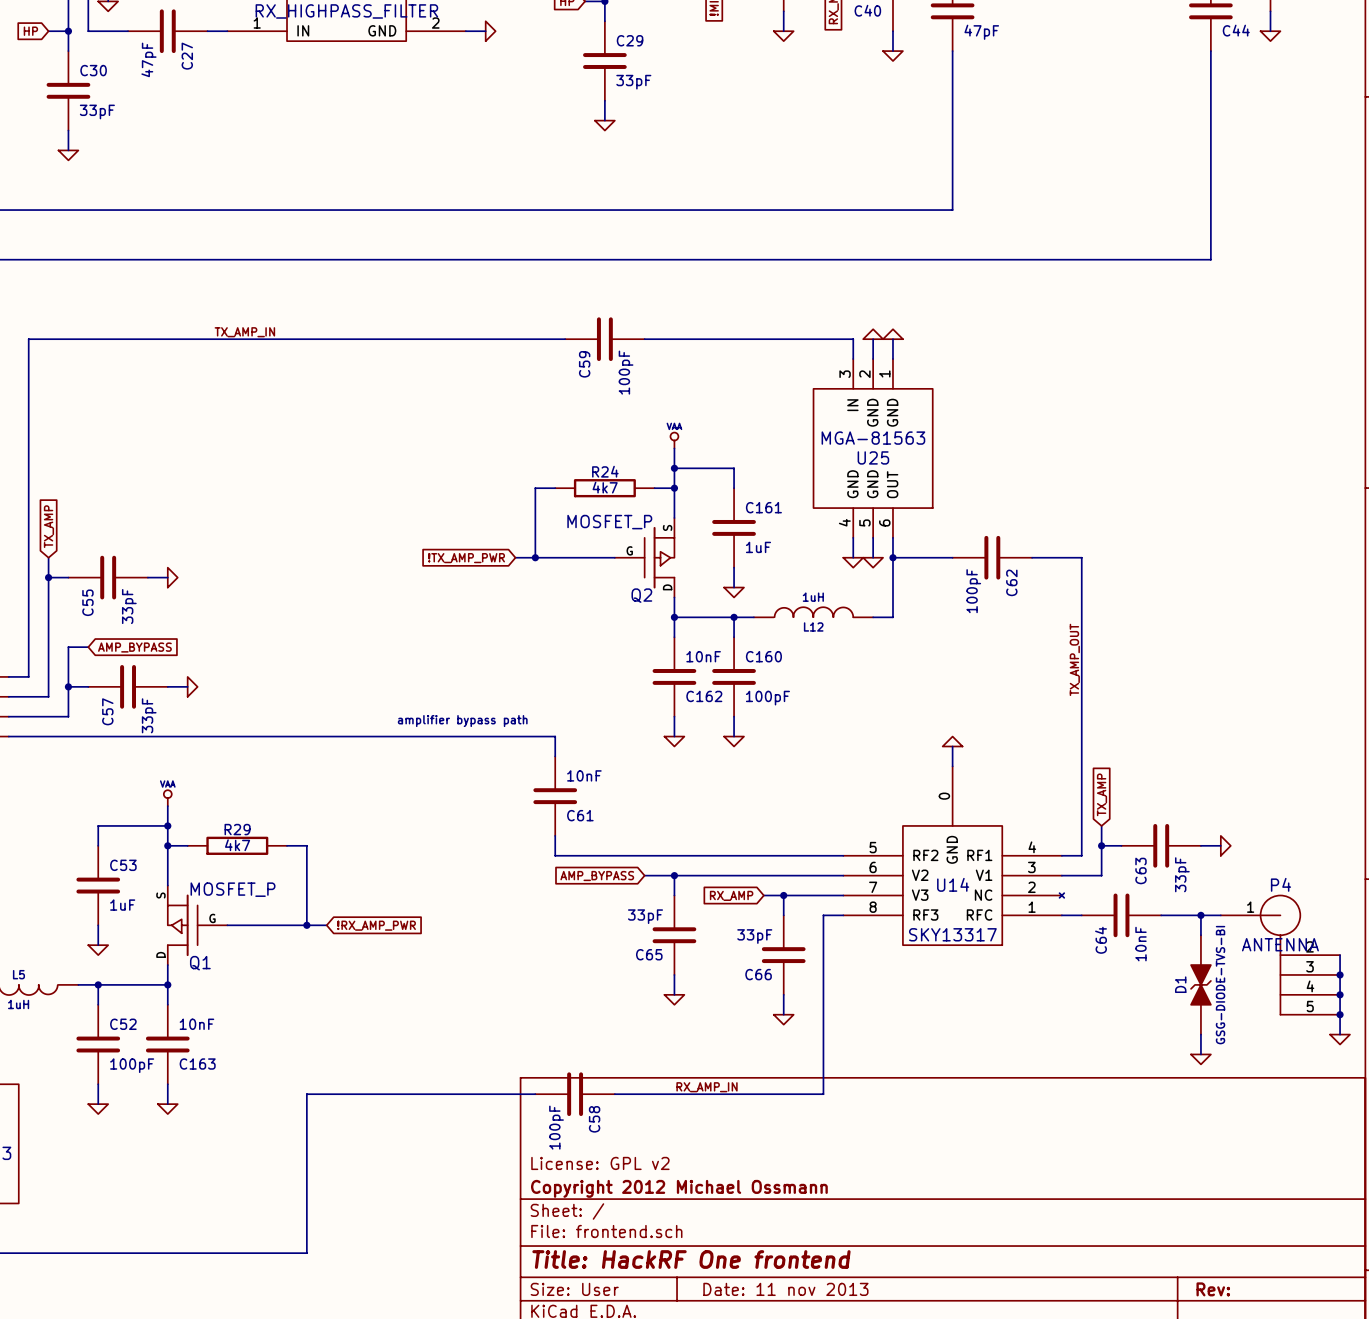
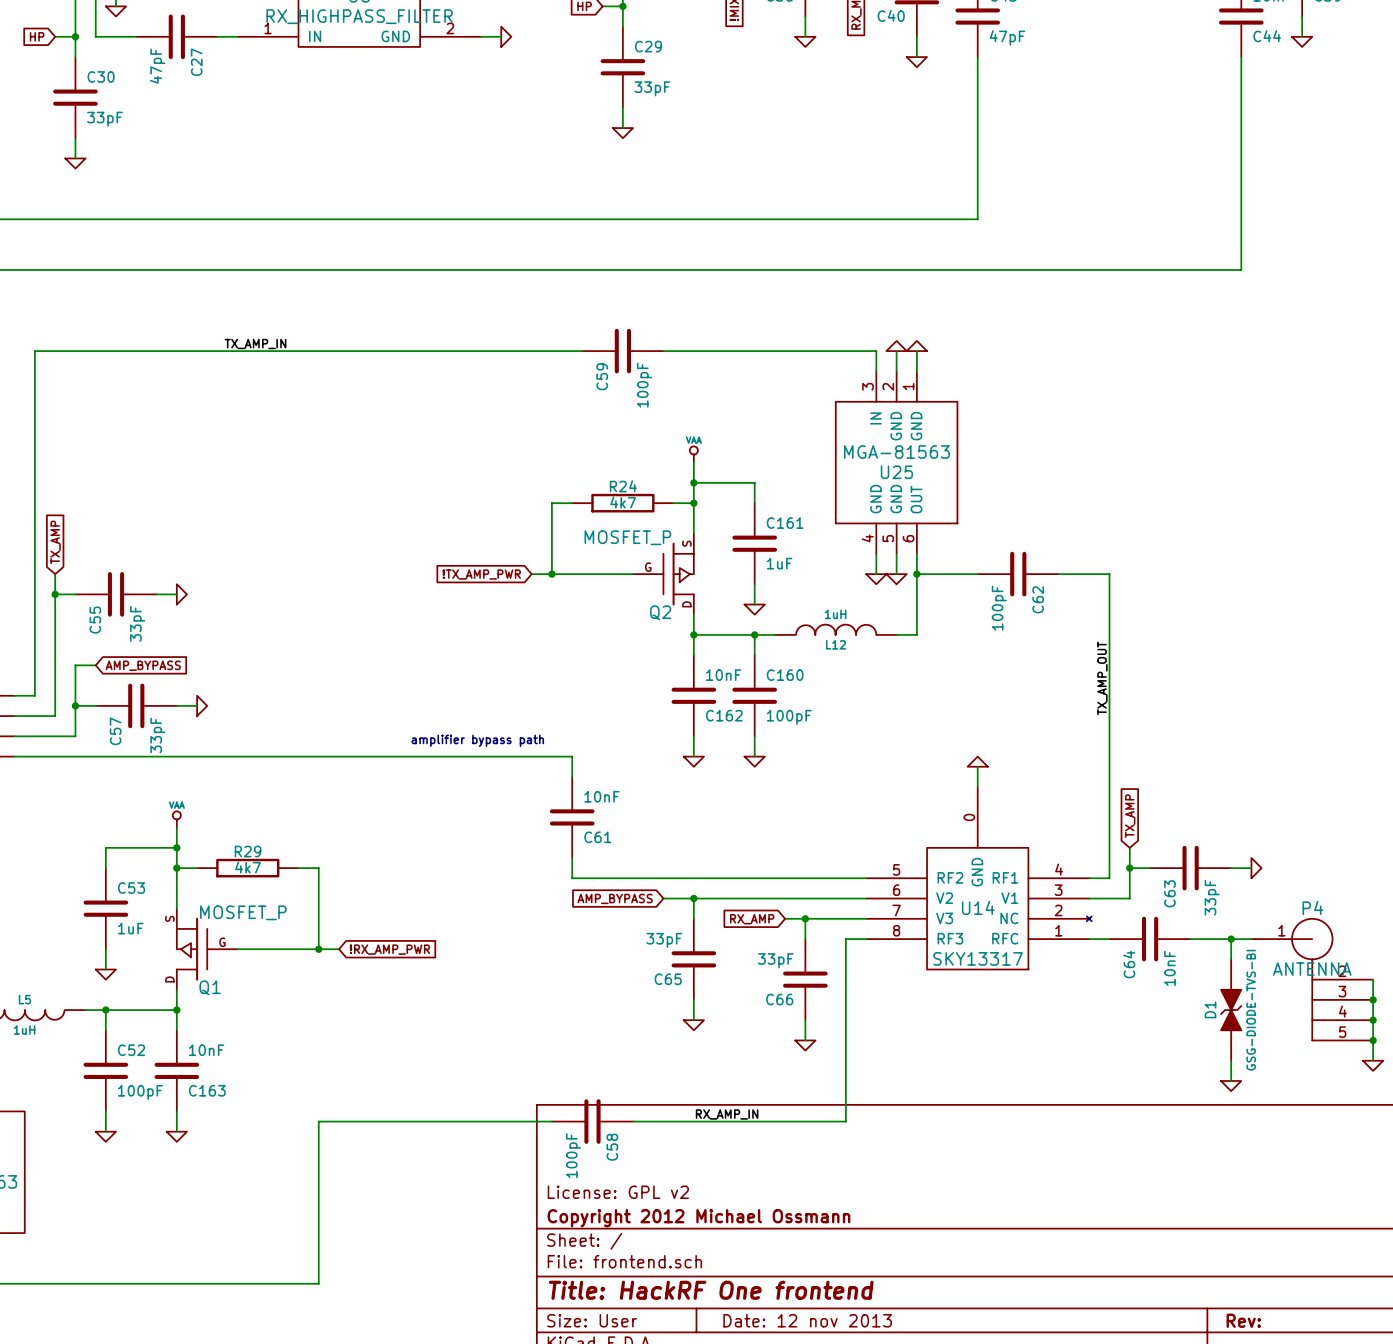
title block: Date: 11 nov 2013 (785, 1289) -> Date: 12 nov 2013 (807, 1320)

